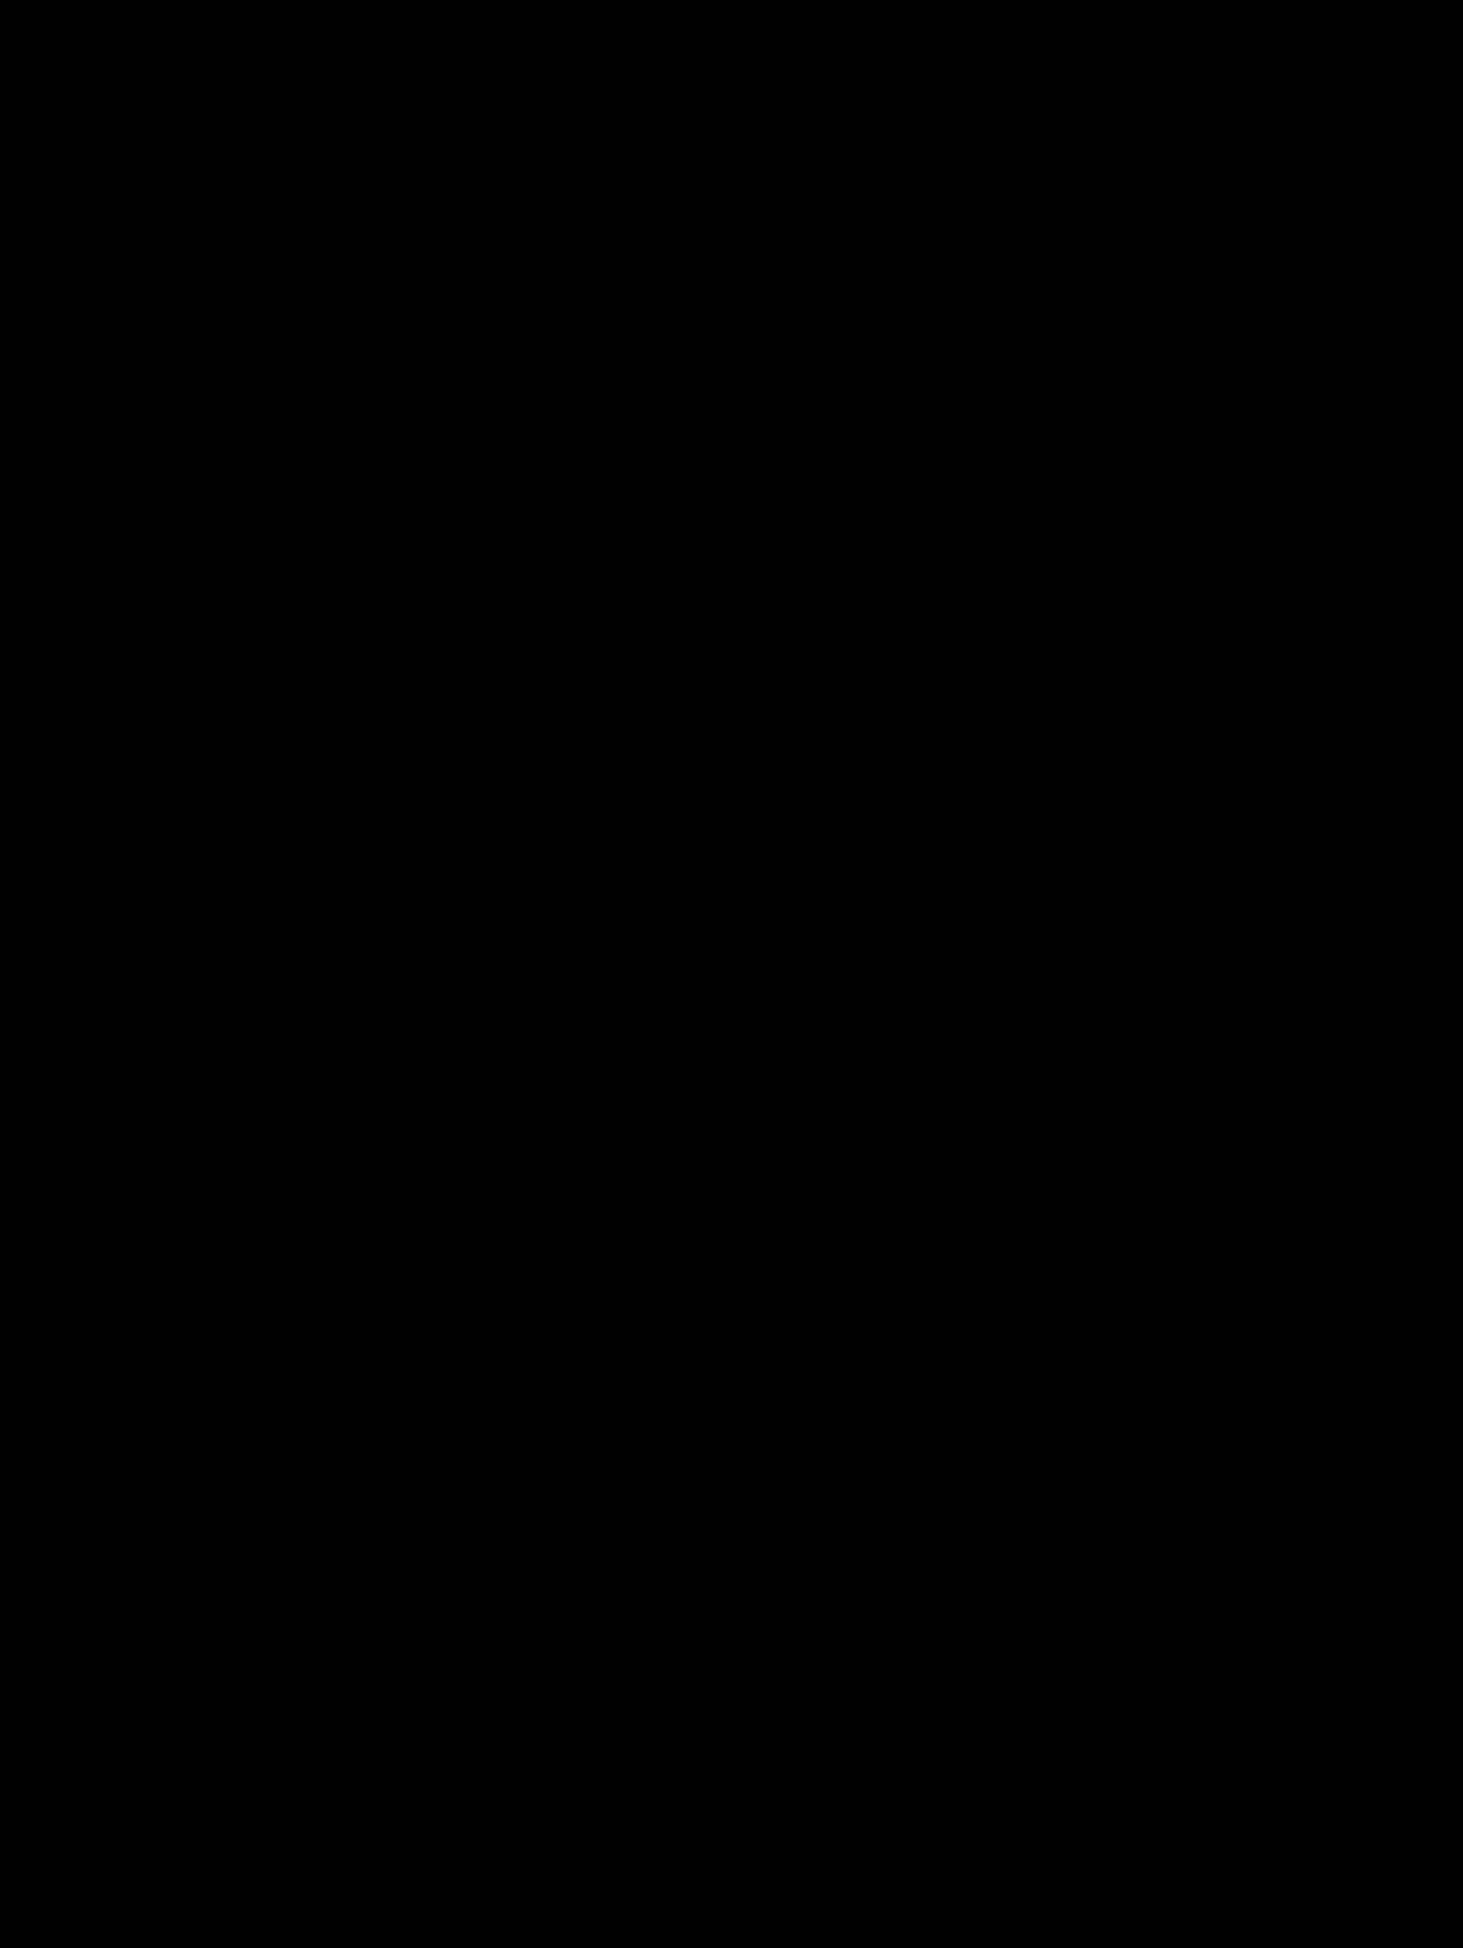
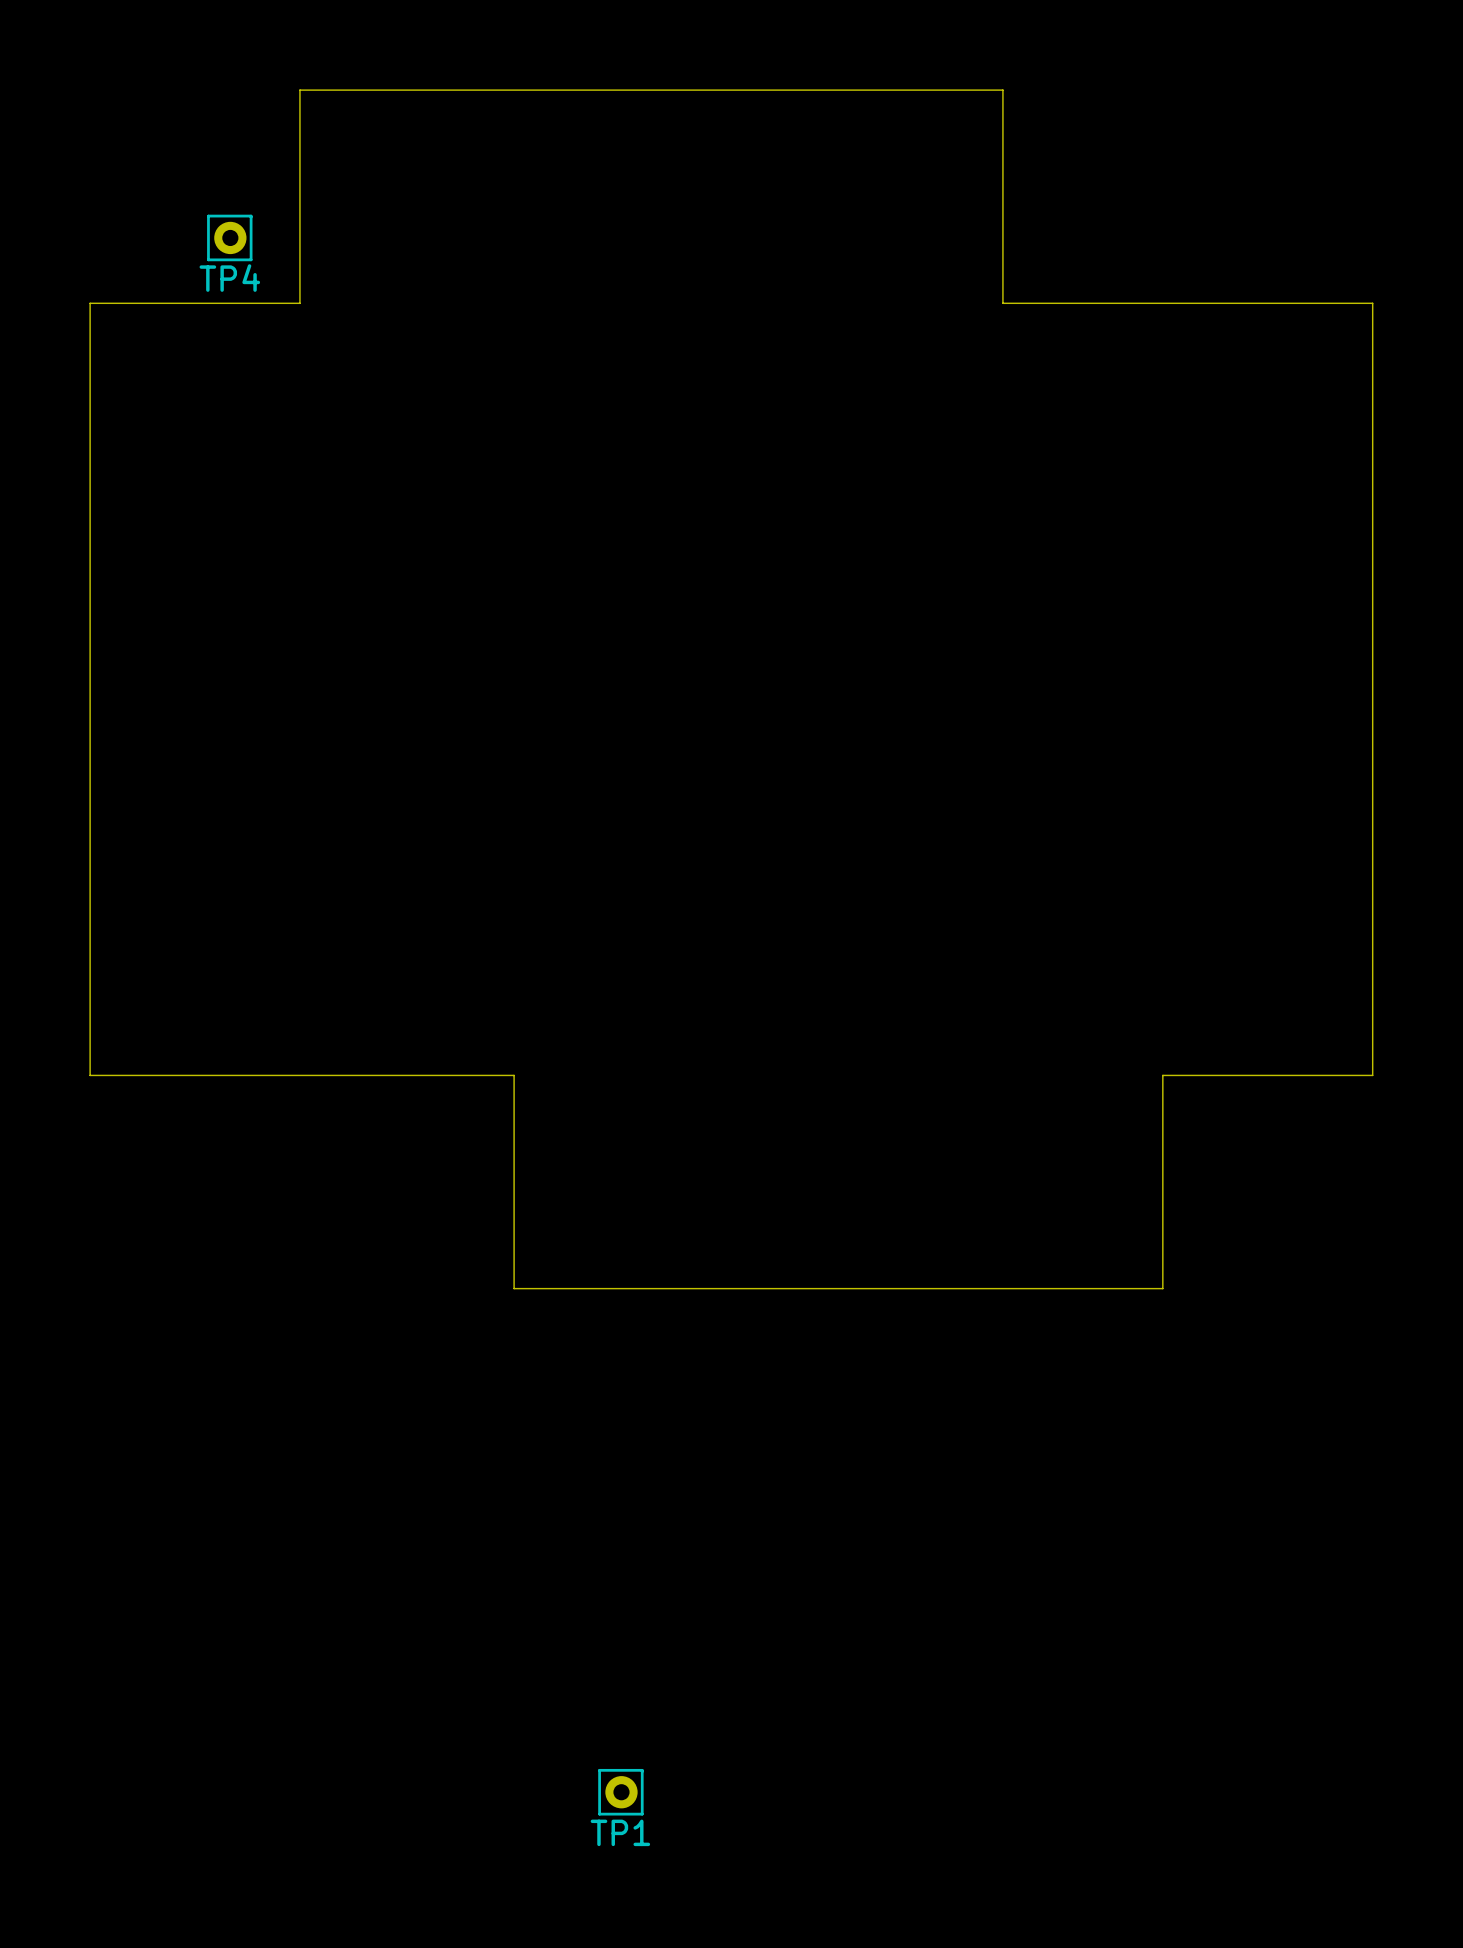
board edge: none -> (299, 90) (299, 303) (90, 303) (90, 1075) (514, 1075) (514, 1288) (1162, 1288) (1162, 1075) (1372, 1075) (1372, 303) (1002, 303) (1002, 90) (299, 90)
TP4: none -> (229, 237)
TP1: none -> (620, 1792)

